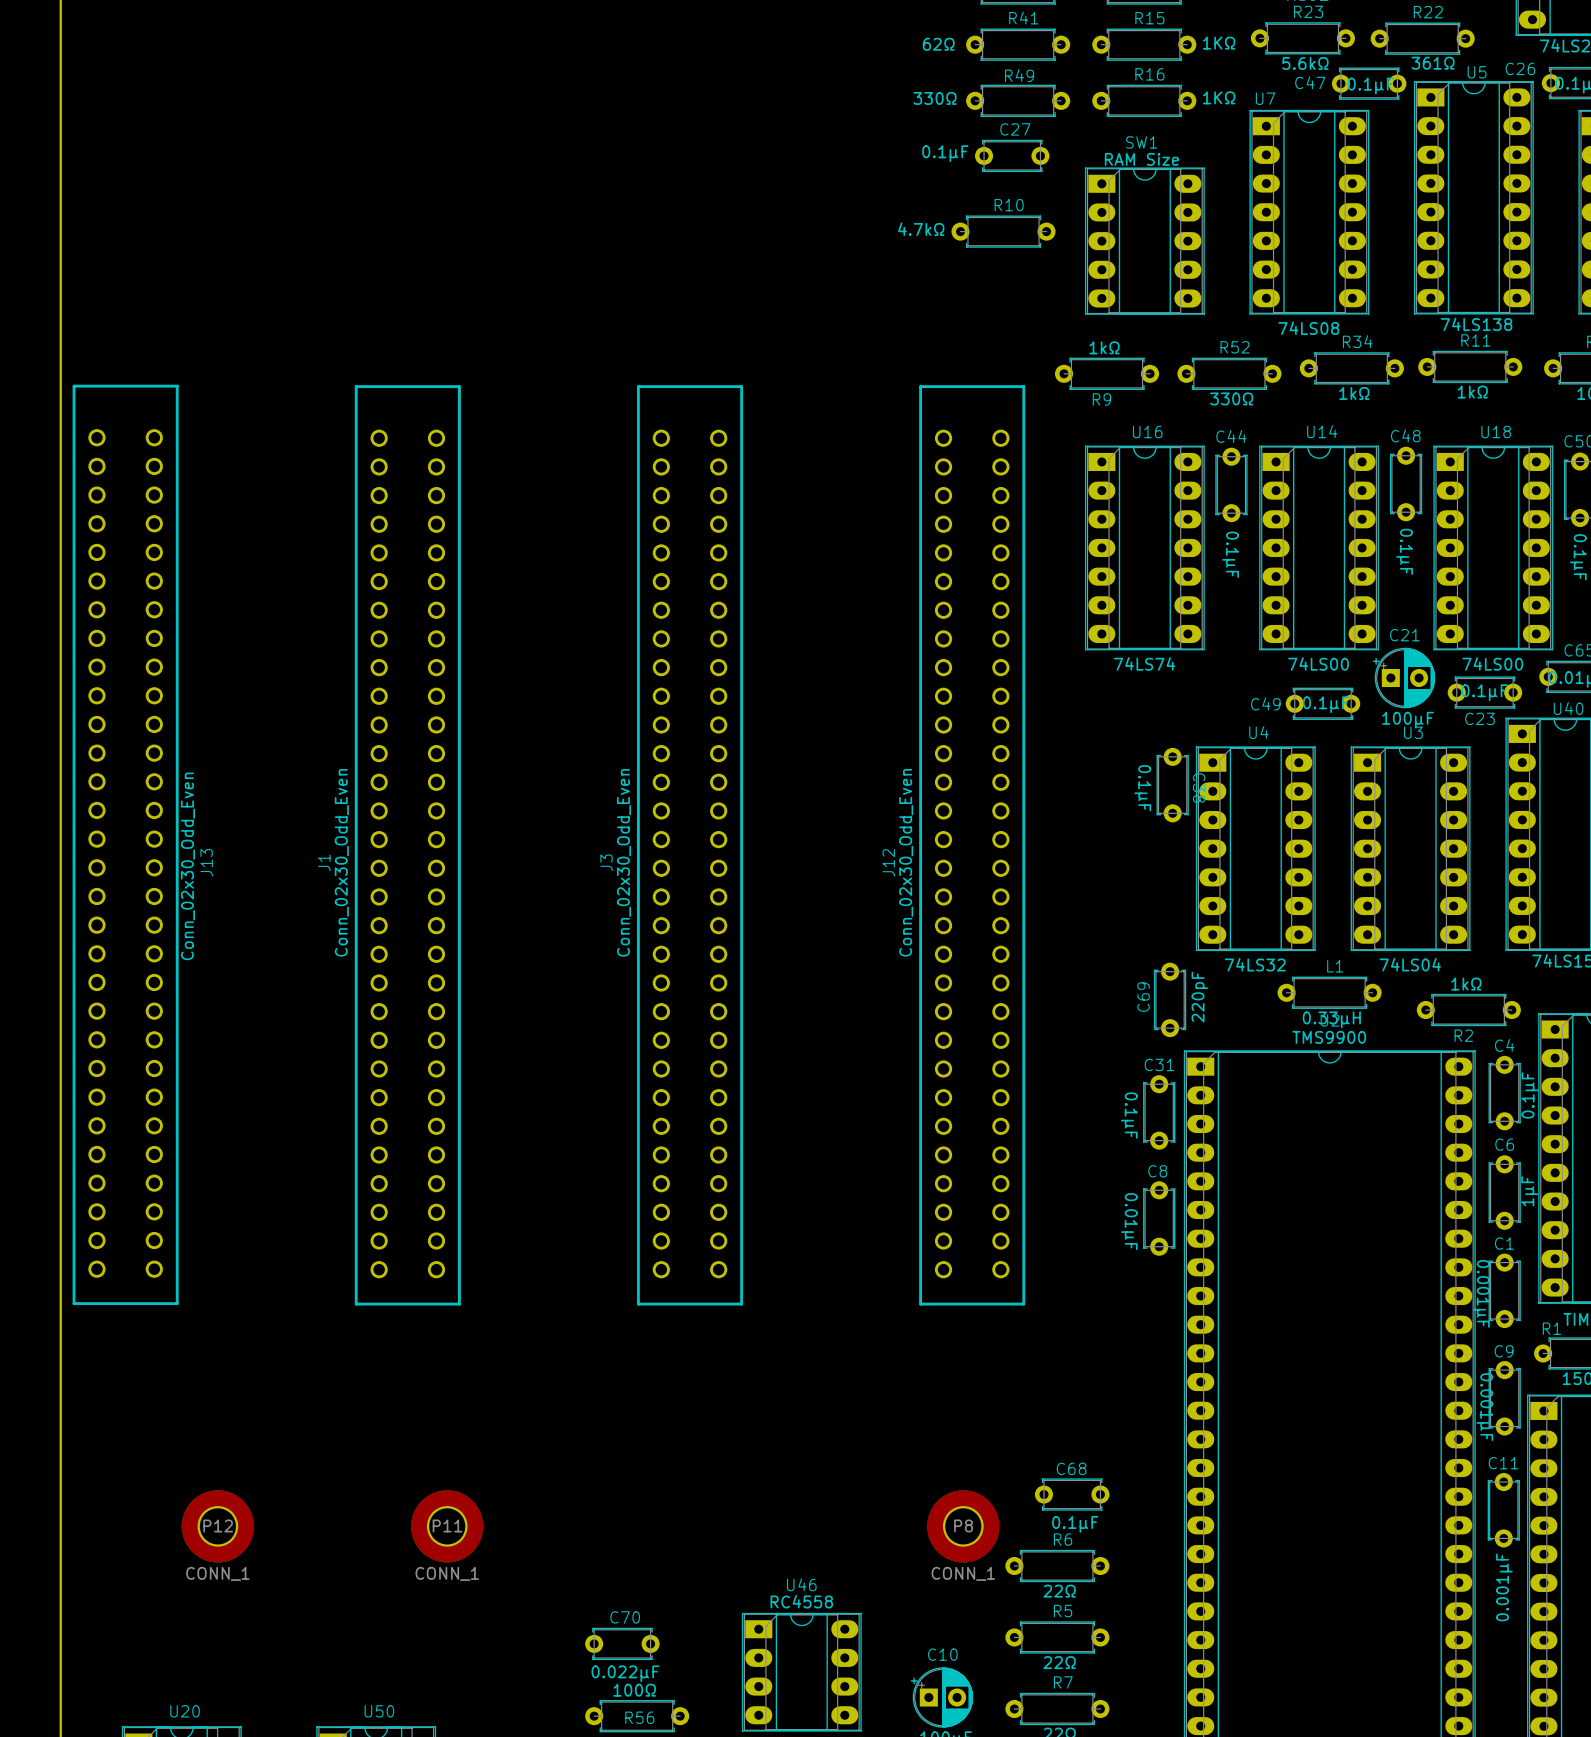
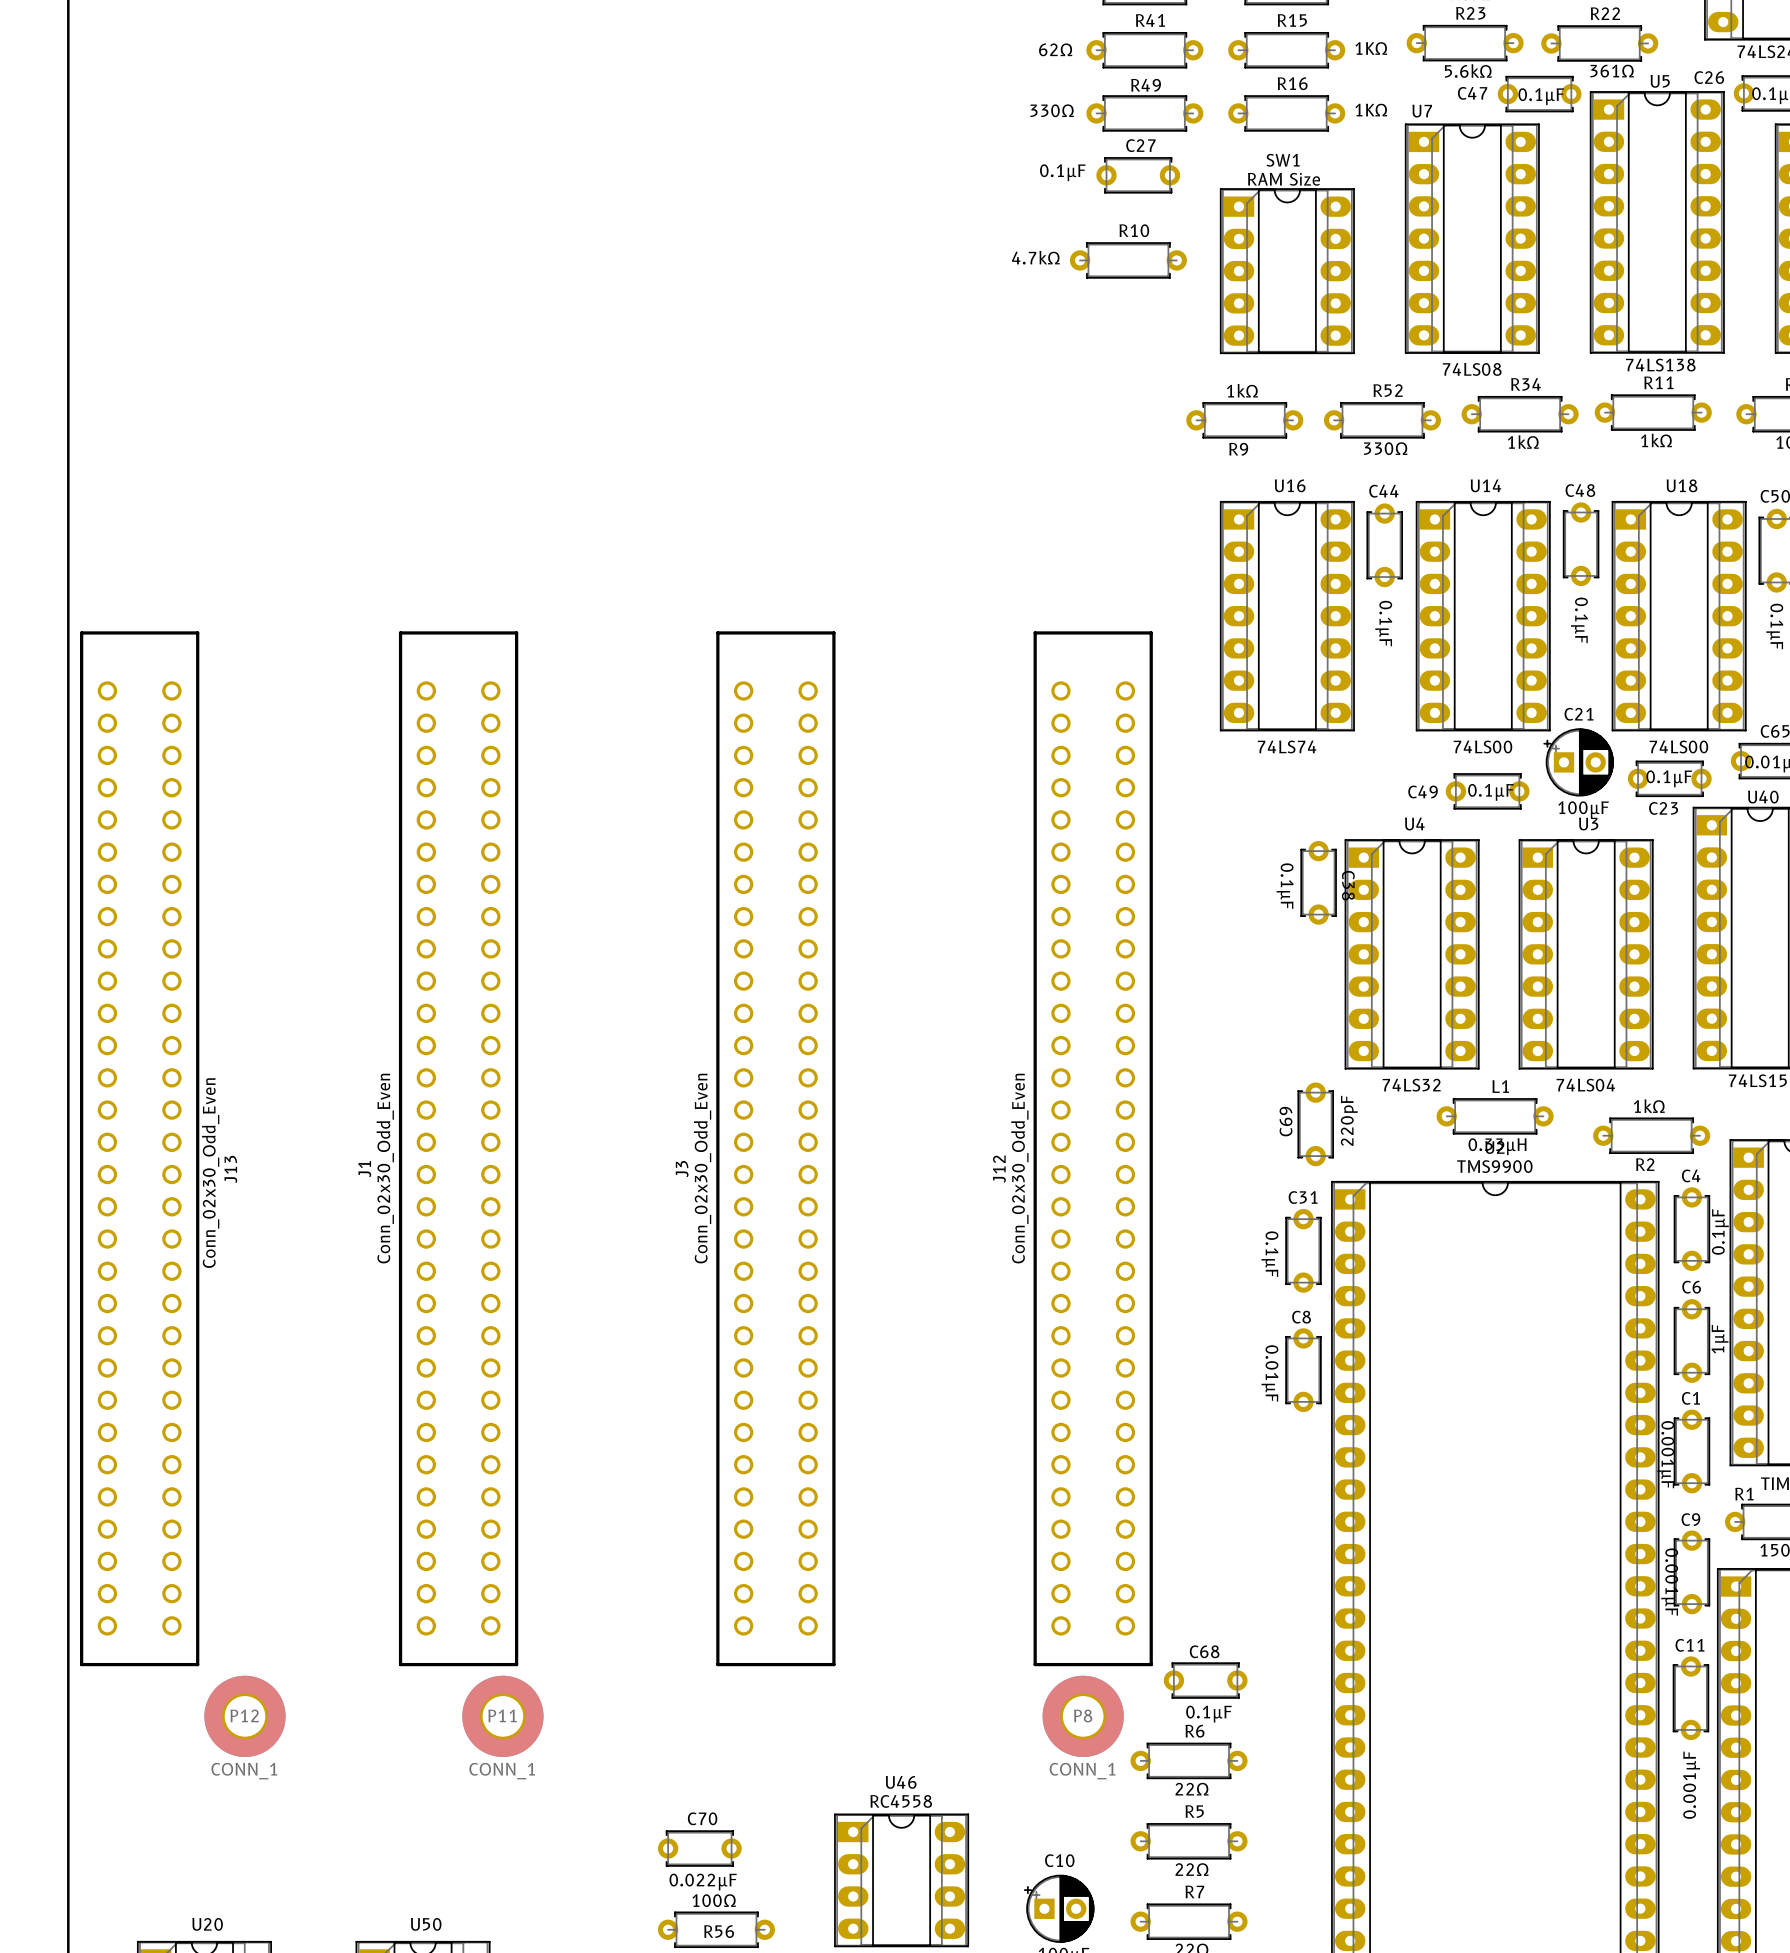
J13 position: (125, 844) -> (139, 1148)
J1 position: (407, 845) -> (458, 1148)
J3 position: (690, 845) -> (775, 1148)
J12 position: (972, 845) -> (1093, 1148)

